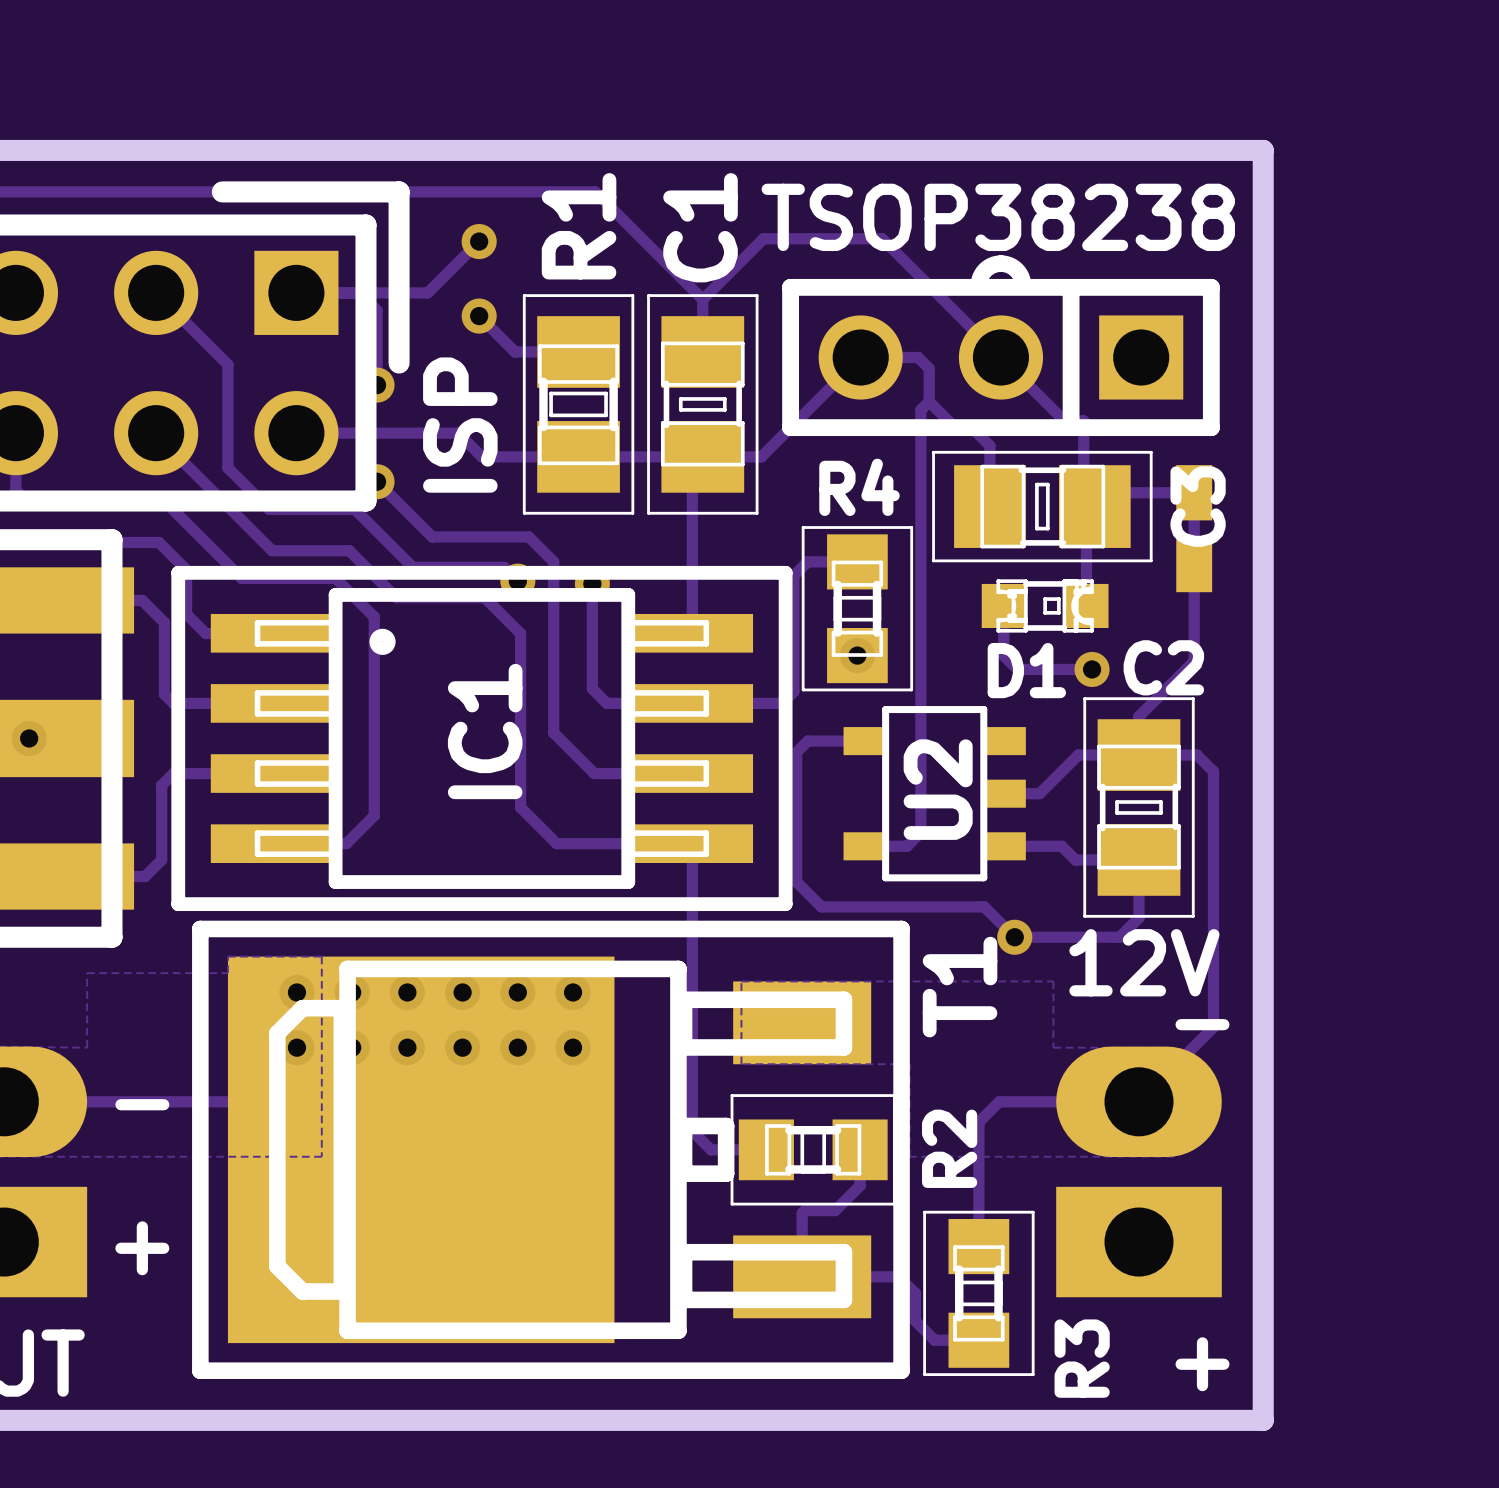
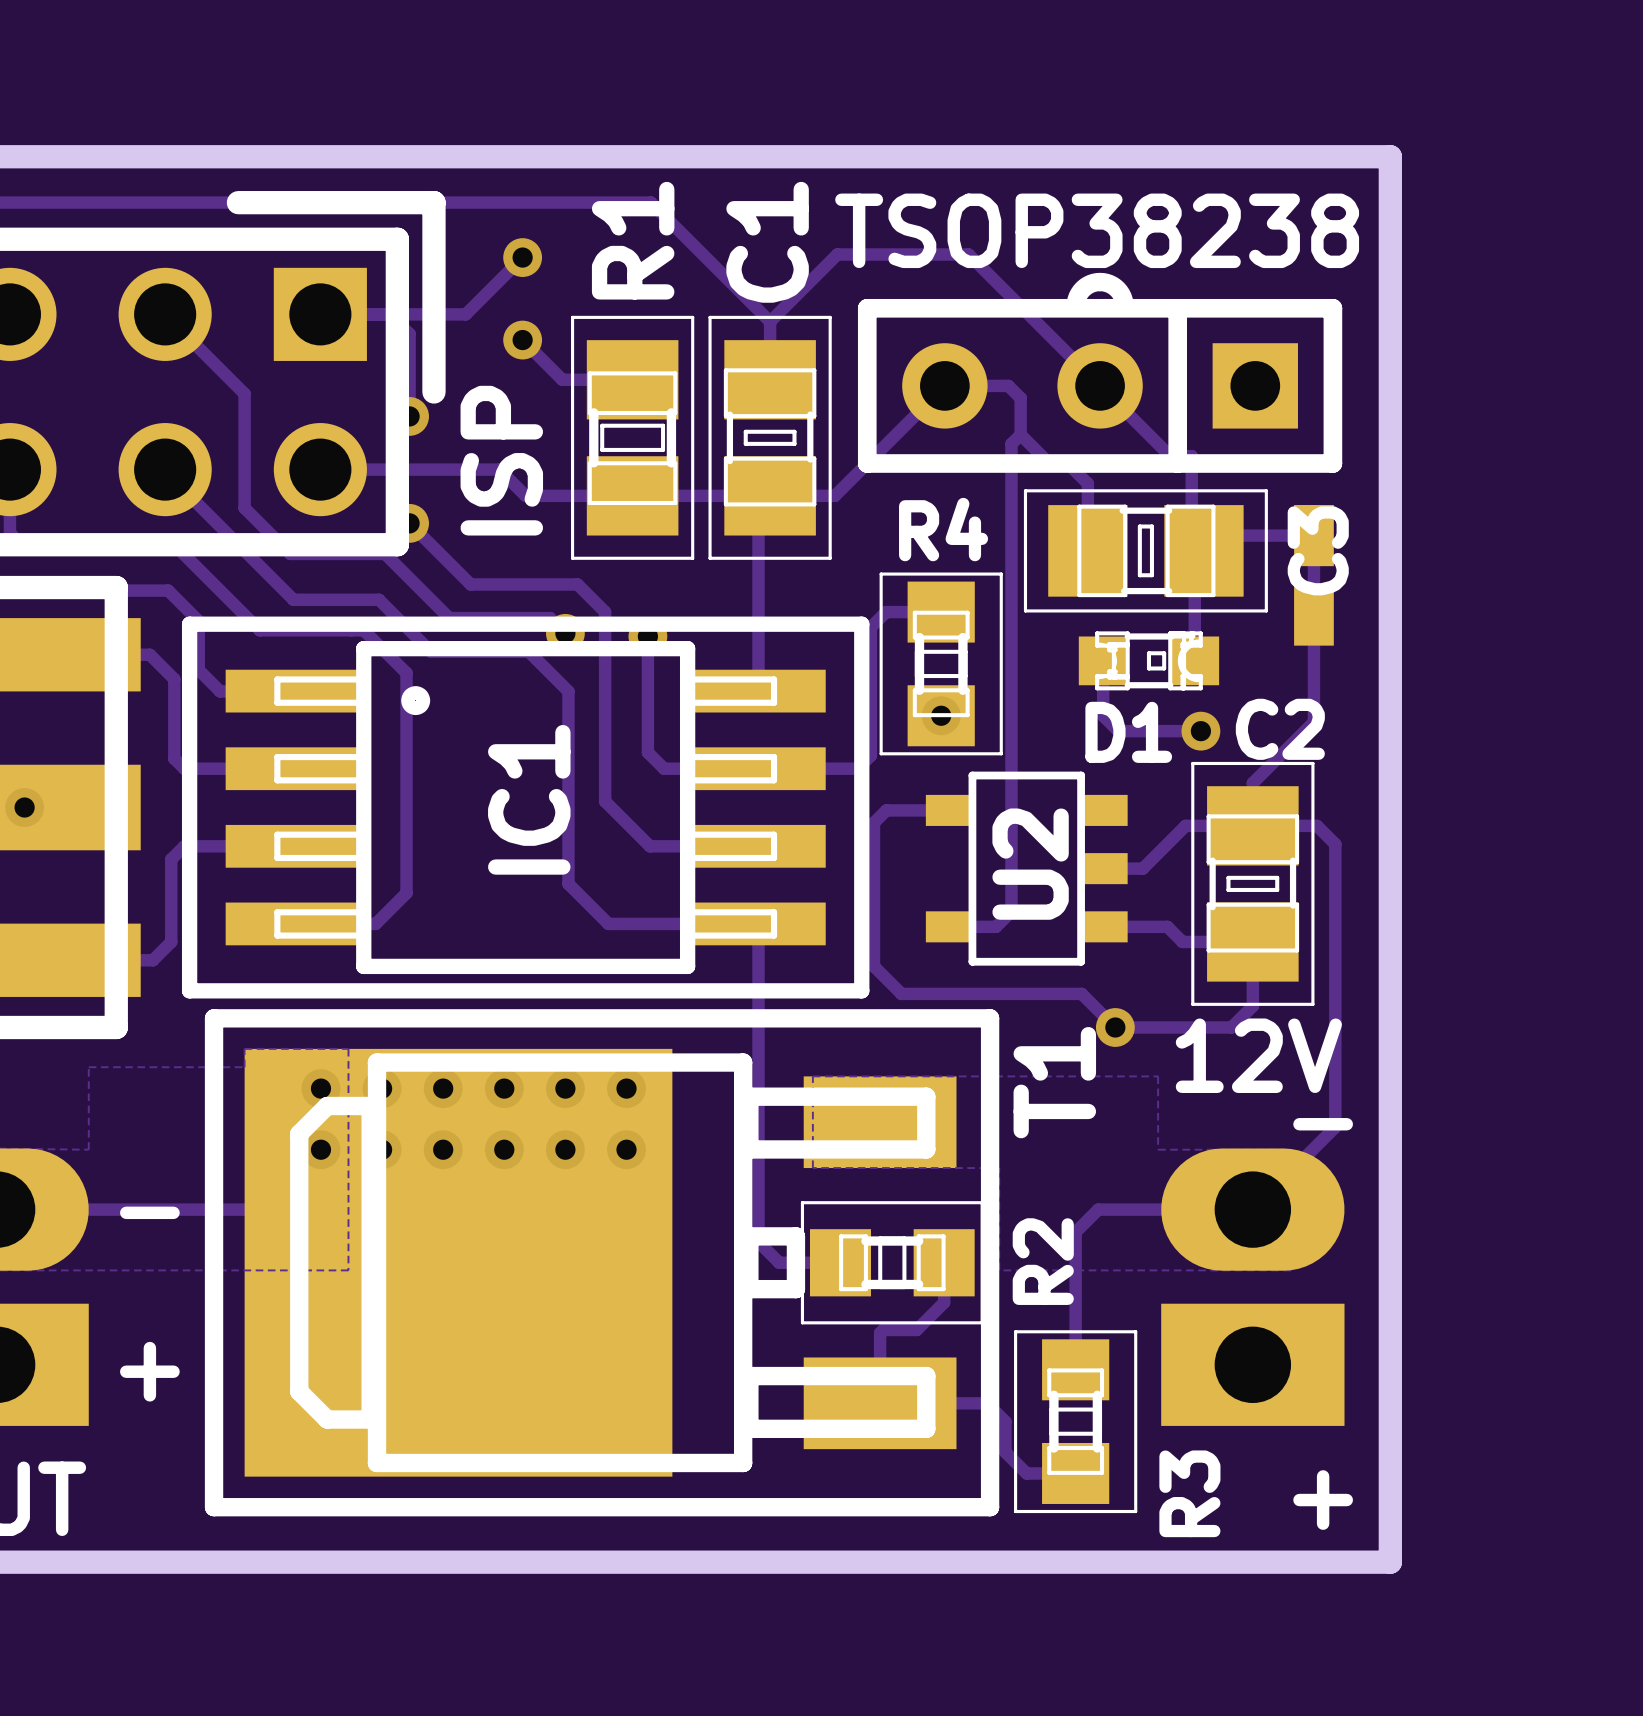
part footprint: [782, 255, 1220, 437] -> [857, 272, 1343, 473]

